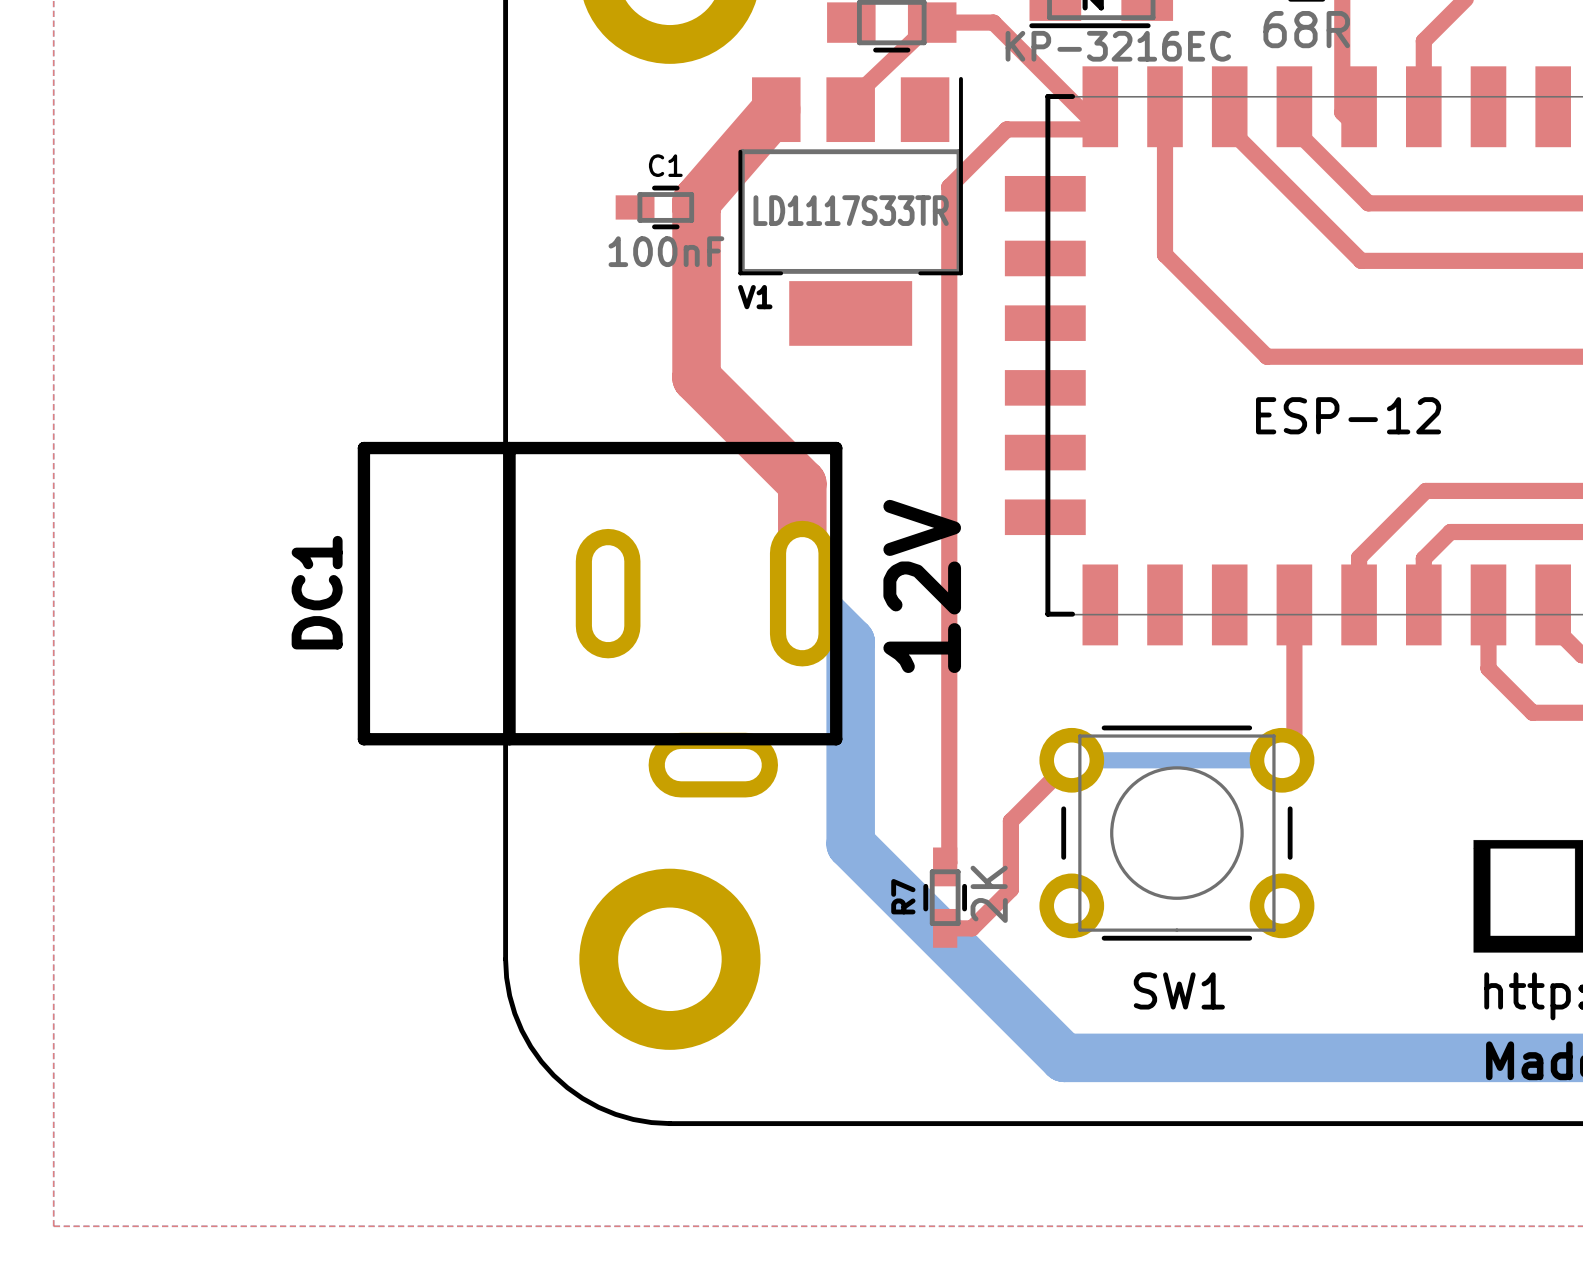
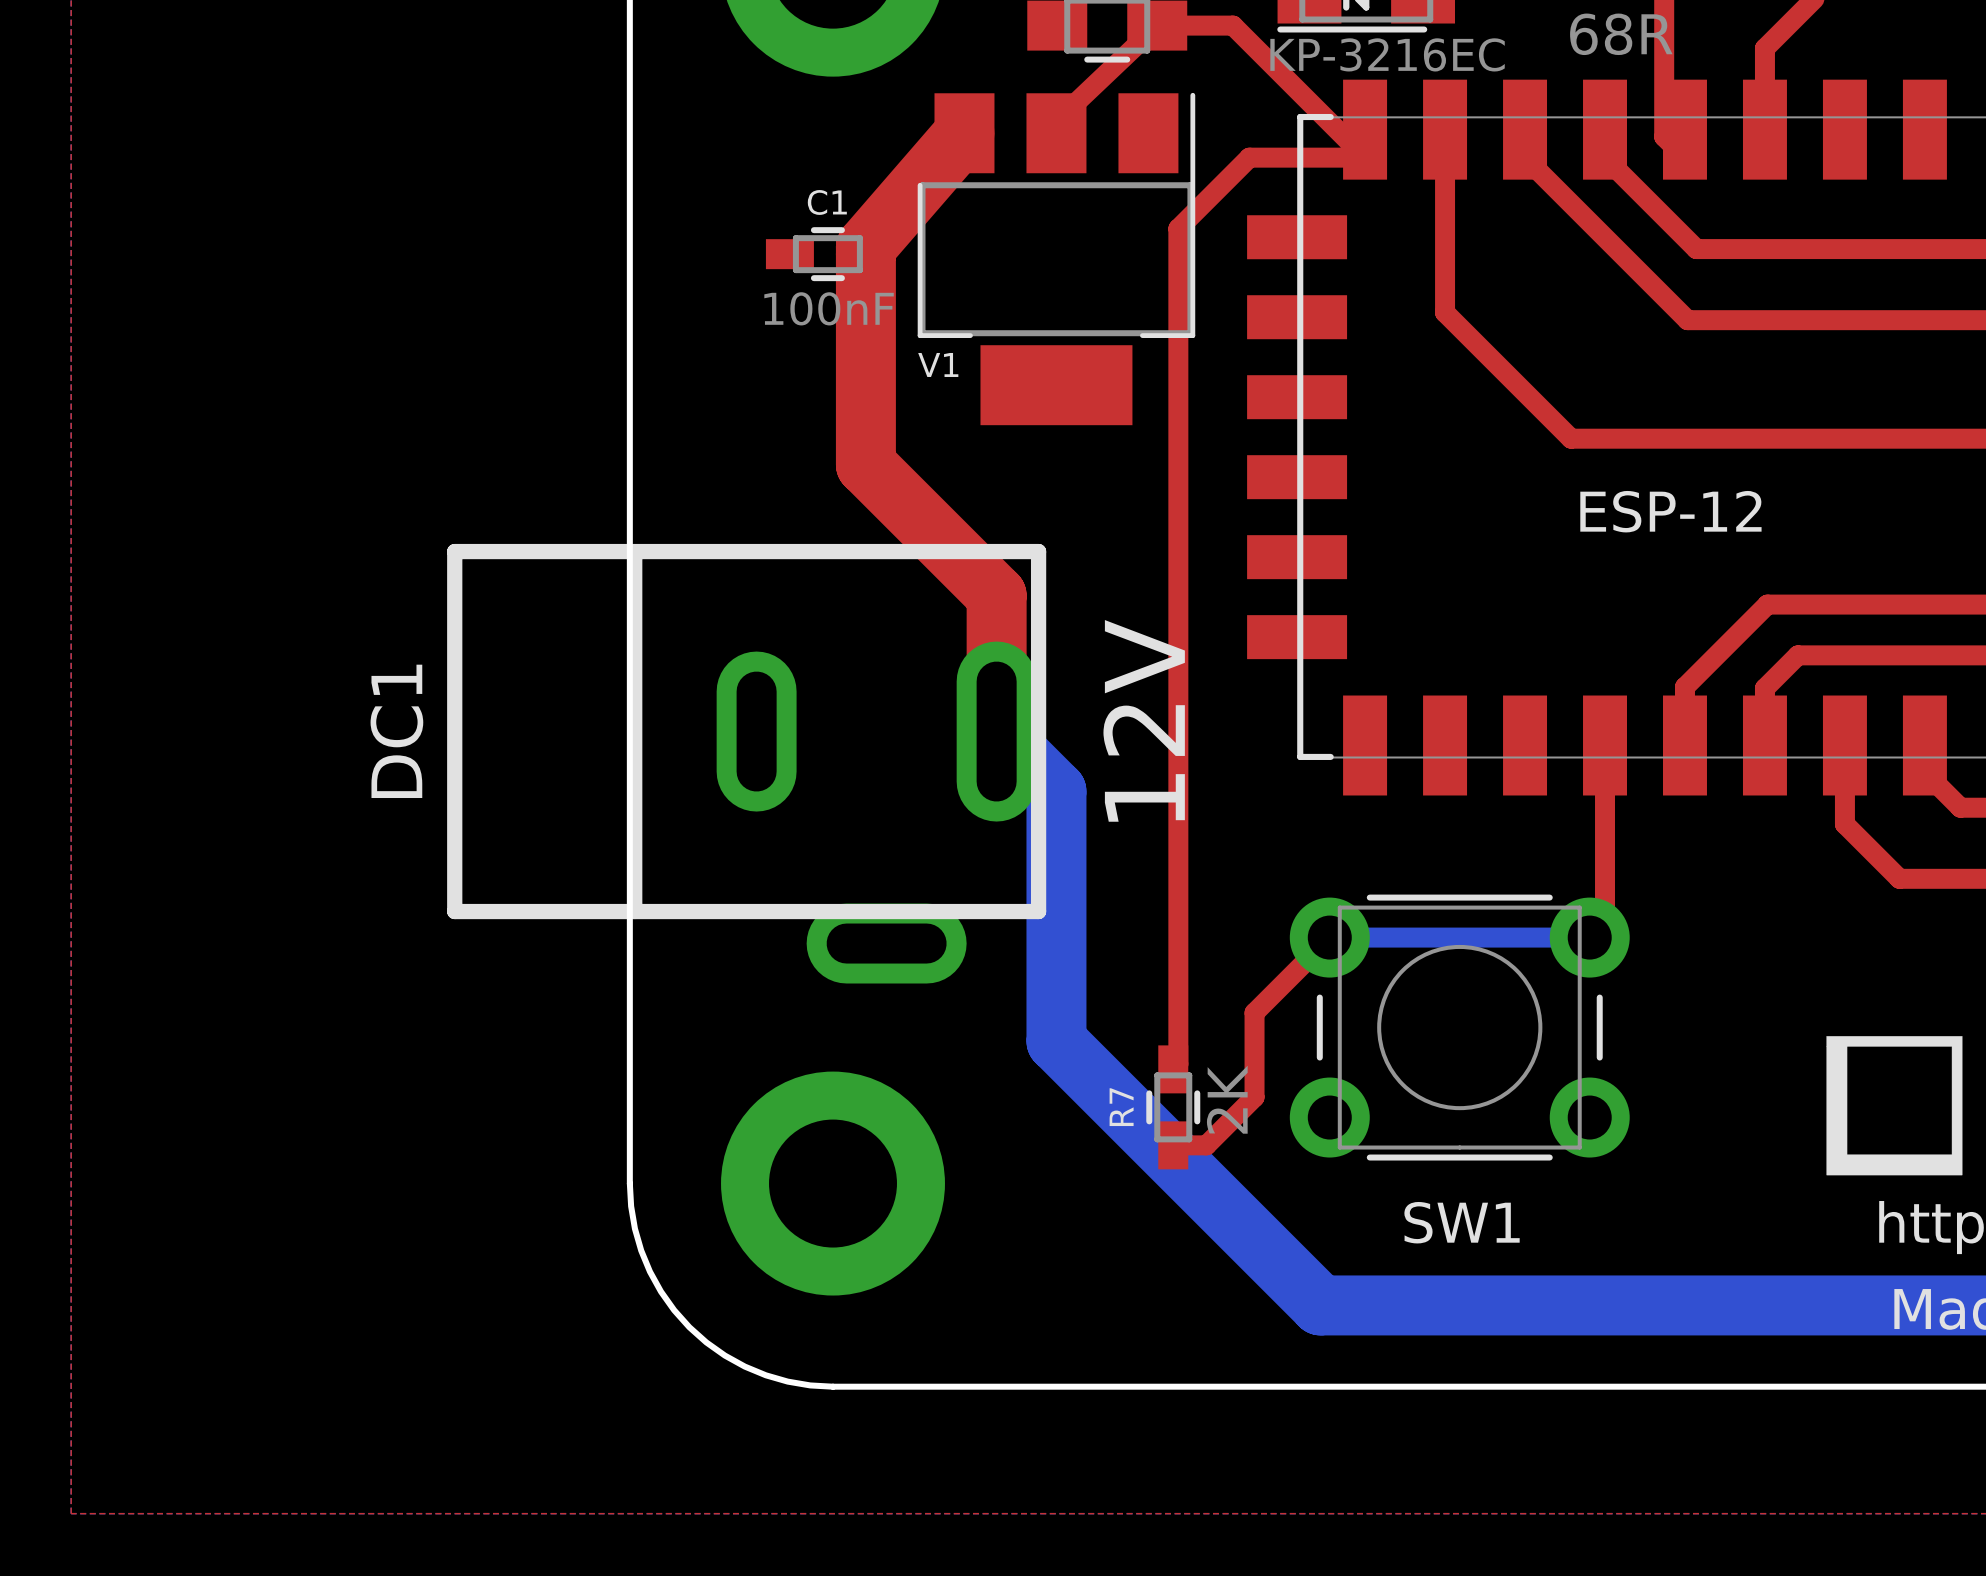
text: LD1117S33TR (851, 210) -> none

